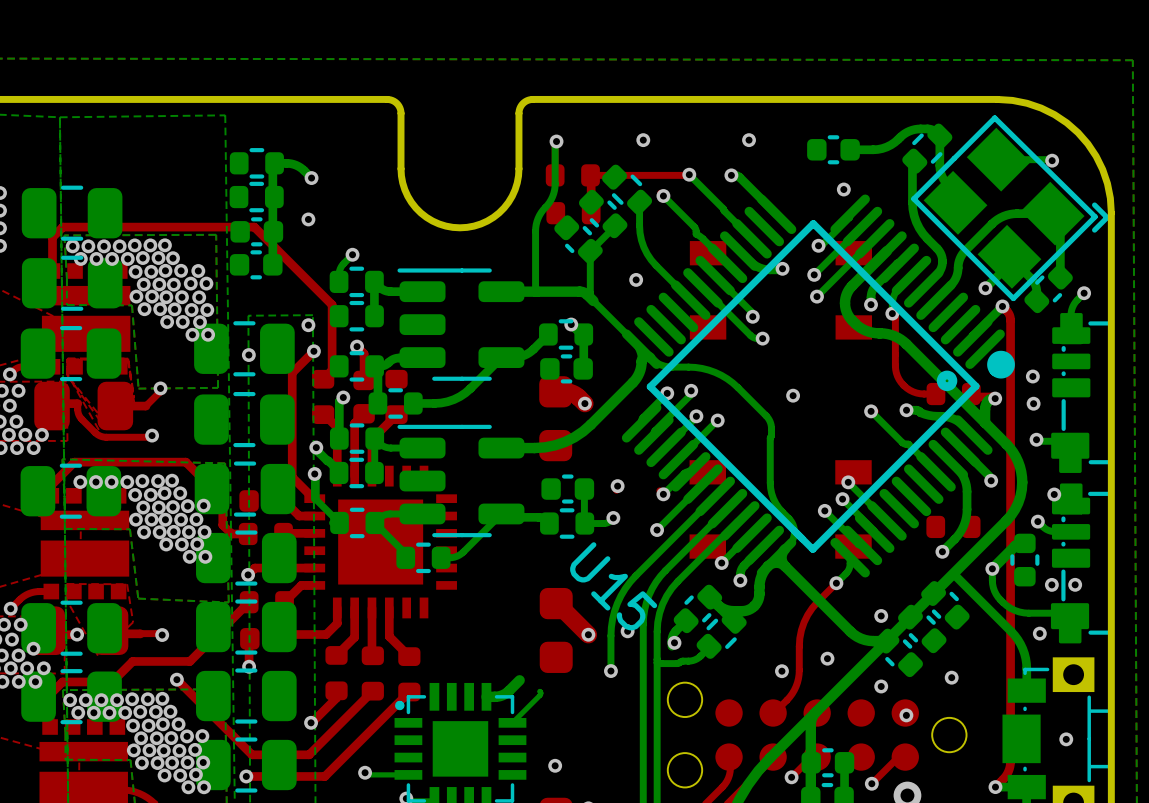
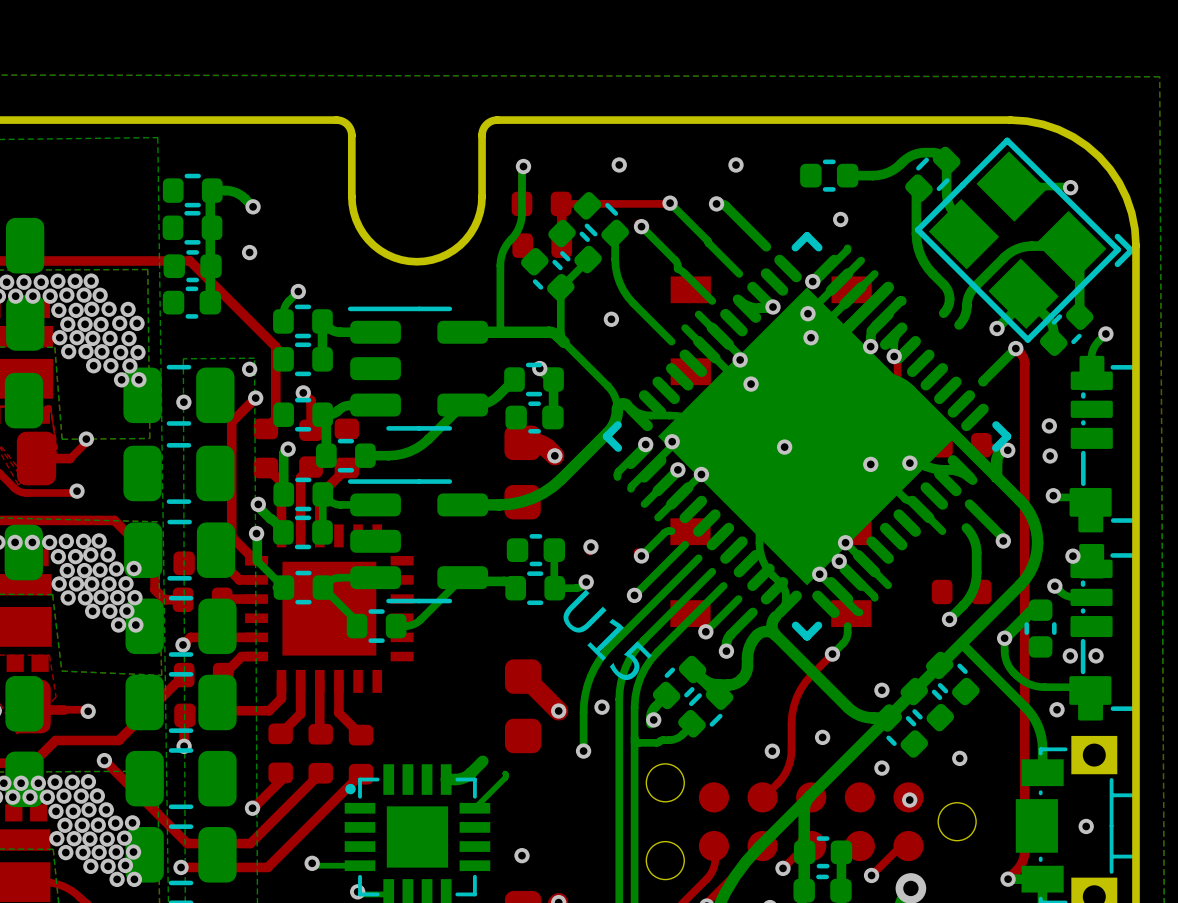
U15 footprint: [621, 194, 1015, 578] -> [602, 232, 1023, 641]

